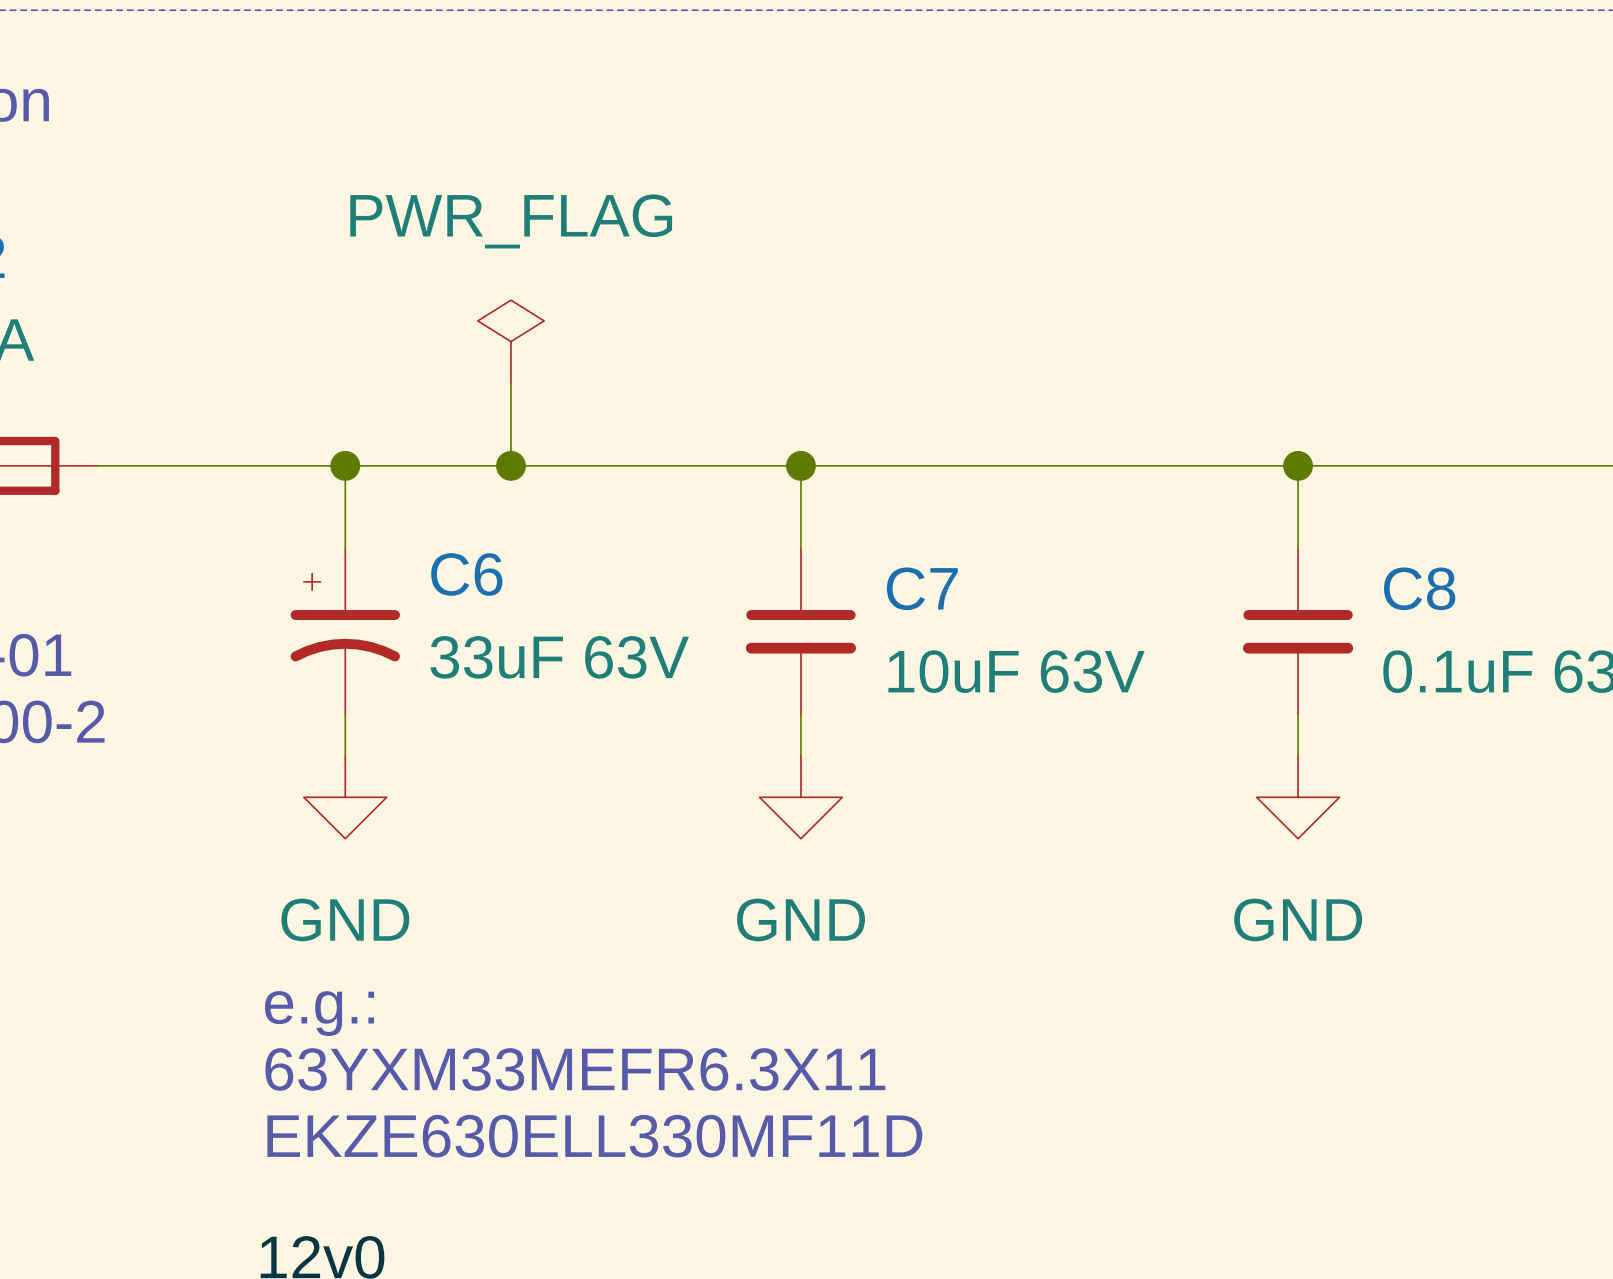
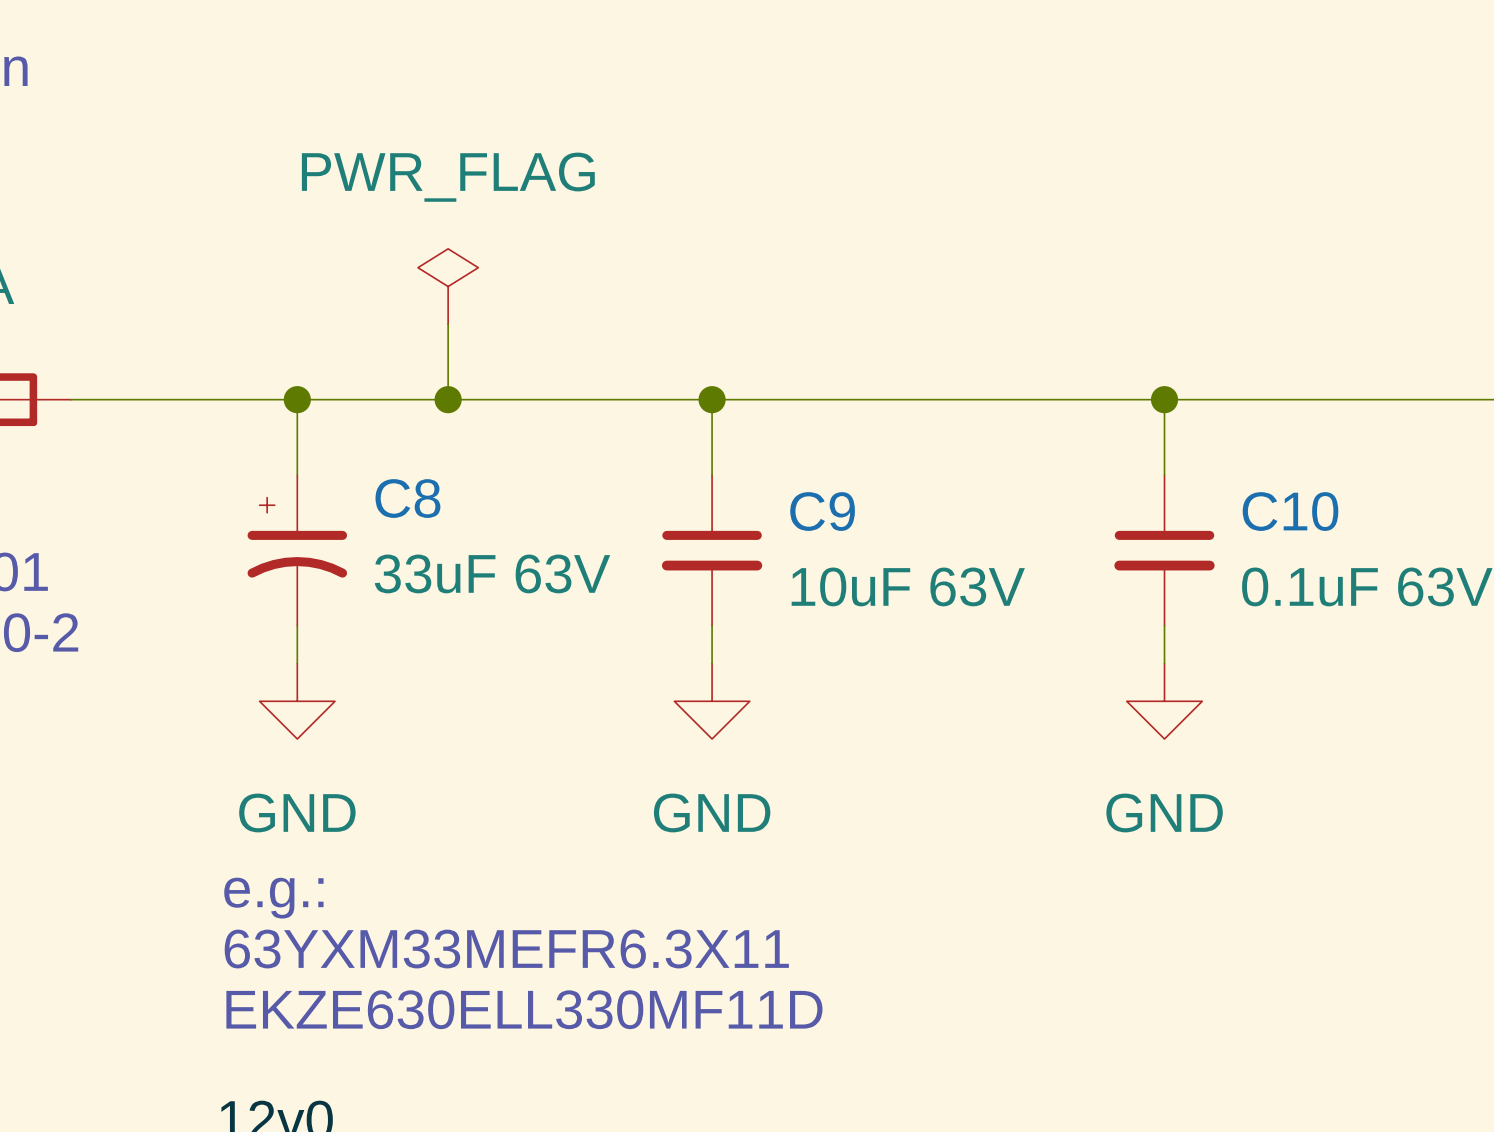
C6 name: C6 (466, 574) -> C8 (407, 498)
C7 name: C7 (922, 588) -> C9 (822, 511)
C8 name: C8 (1419, 588) -> C10 (1290, 511)

